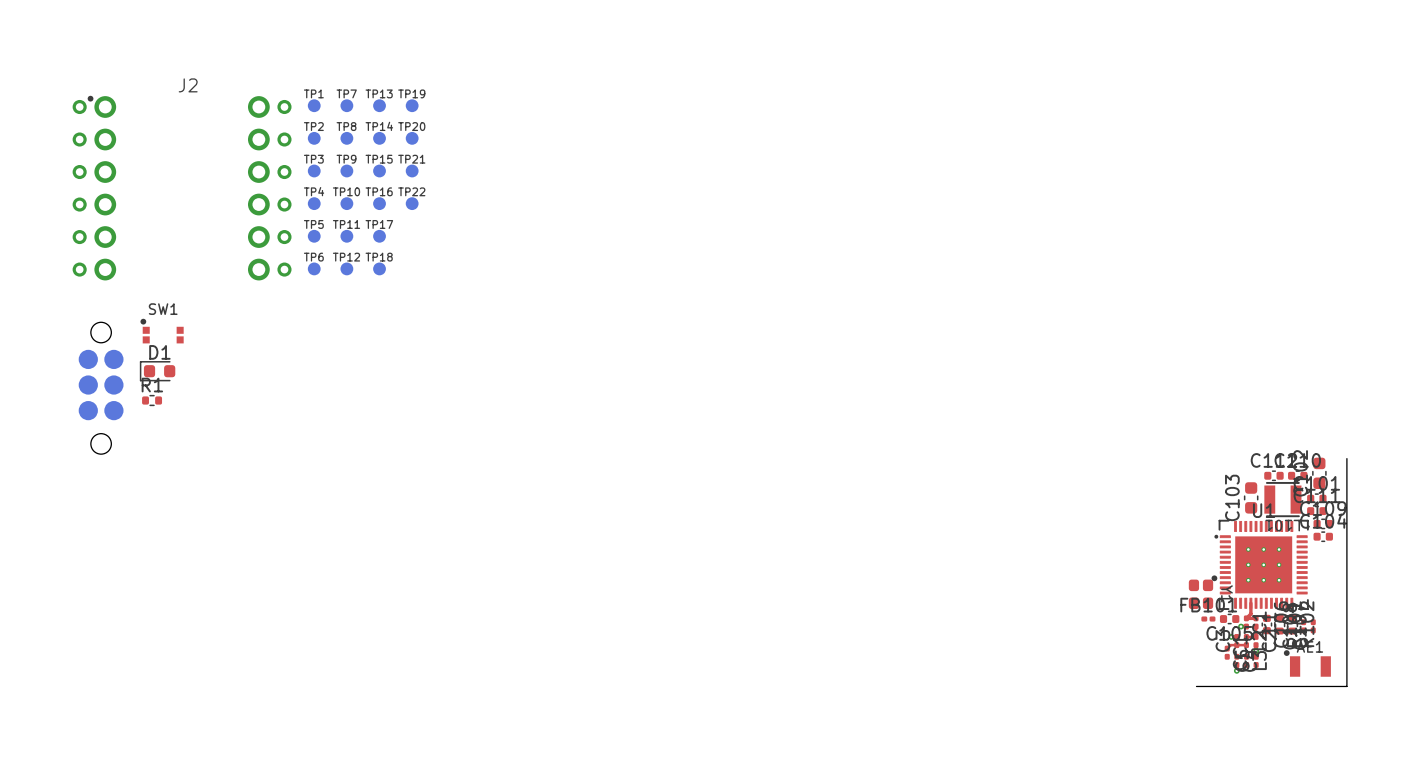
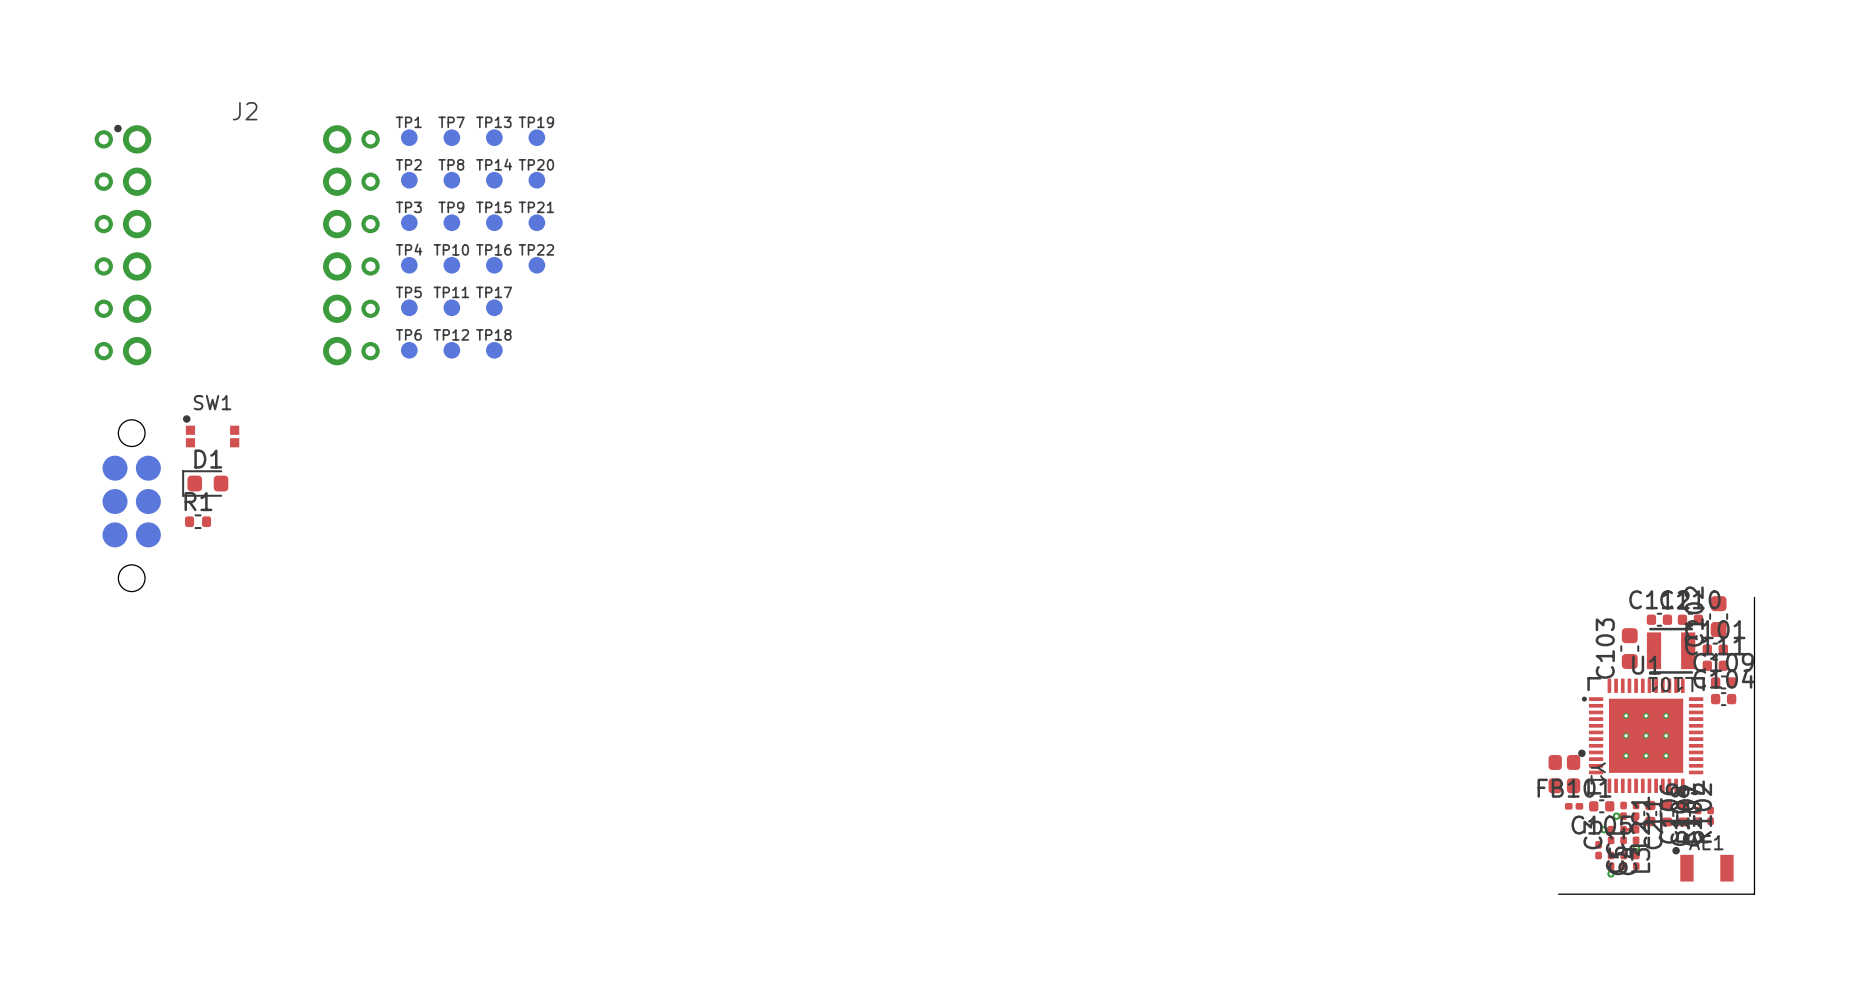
top track: (1250, 603) (1250, 613) (1246, 618) (1256, 618) -> none
top track: (1246, 645) (1230, 645) (1227, 648) -> none

